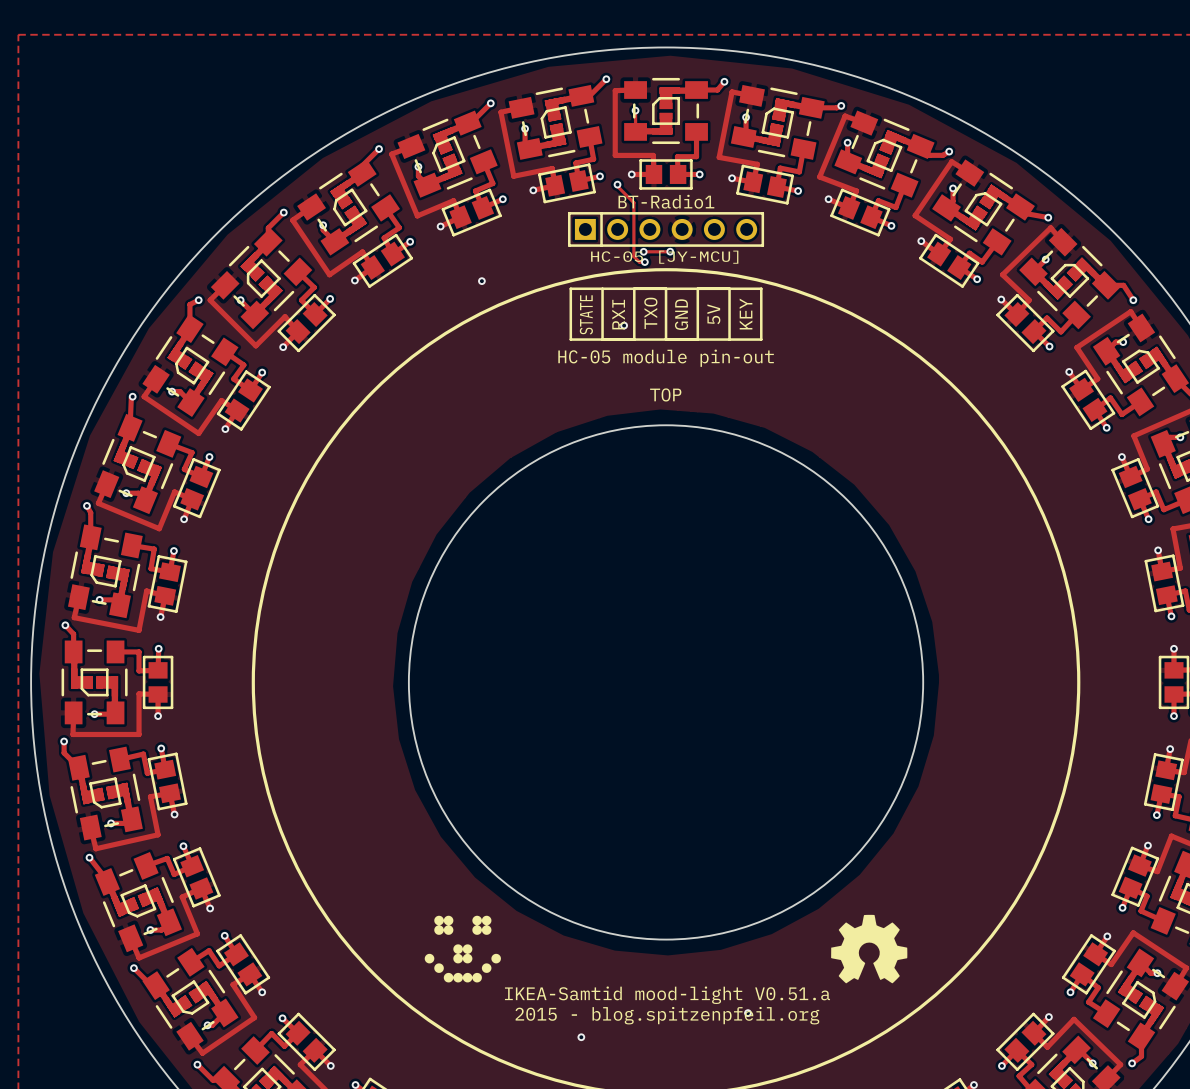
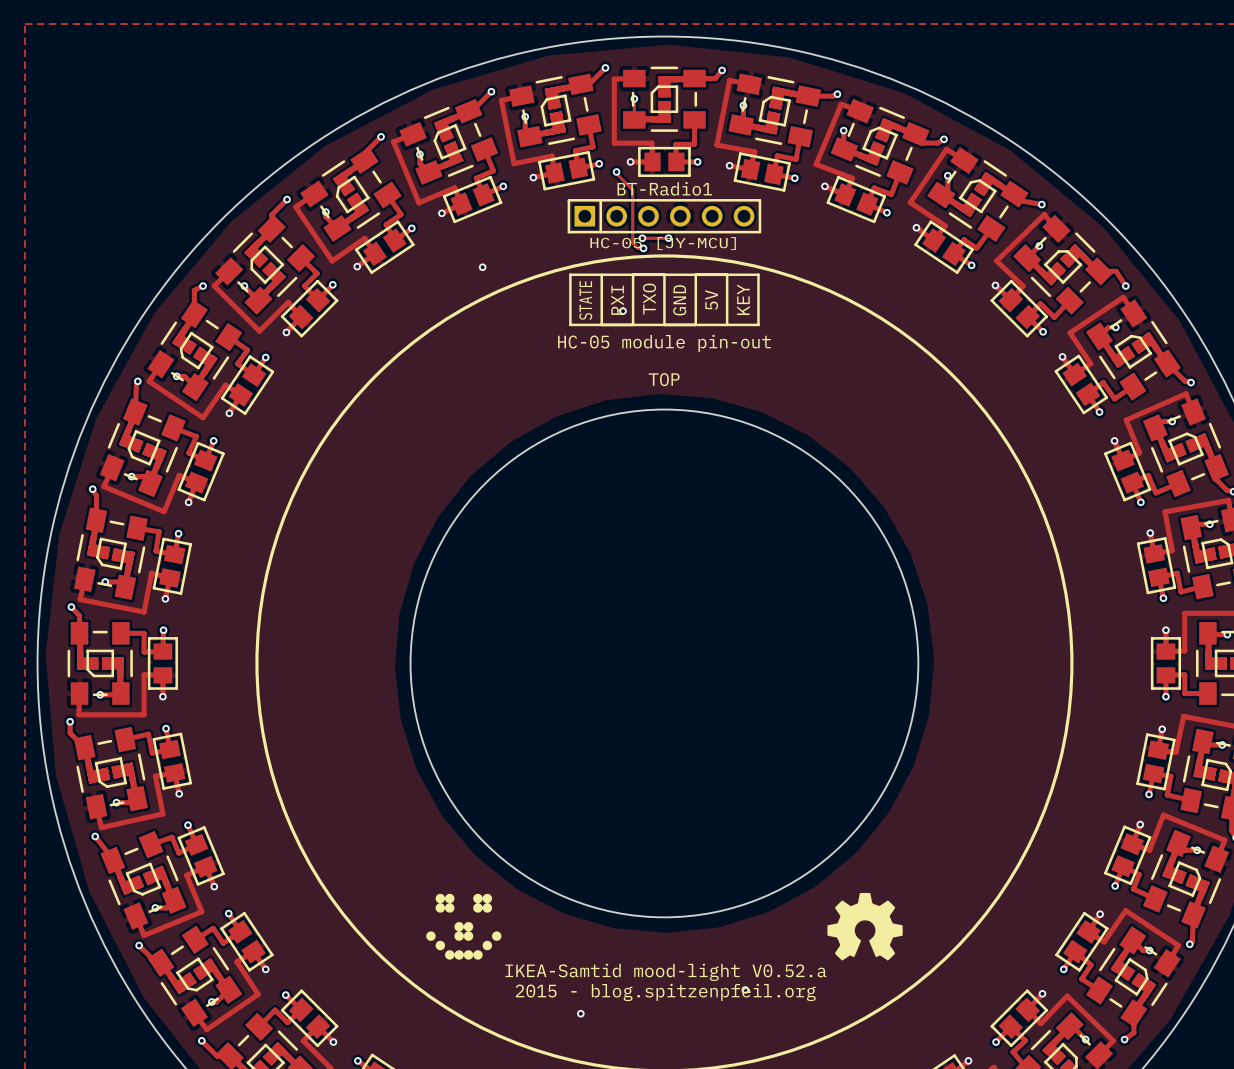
text: IKEA-Samtid mood-light V0.51.a (667, 995) -> IKEA-Samtid mood-light V0.52.a (665, 972)

